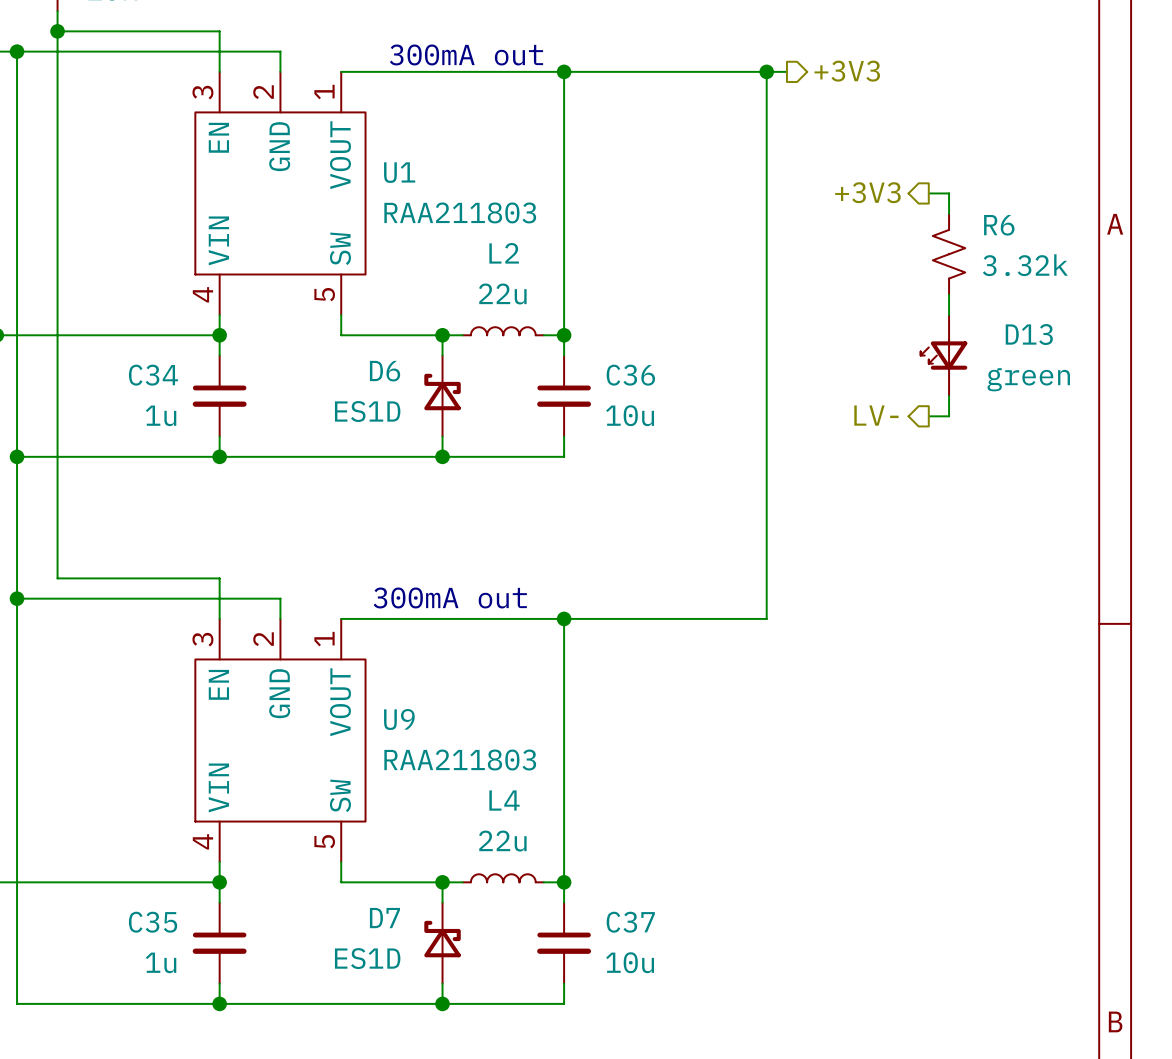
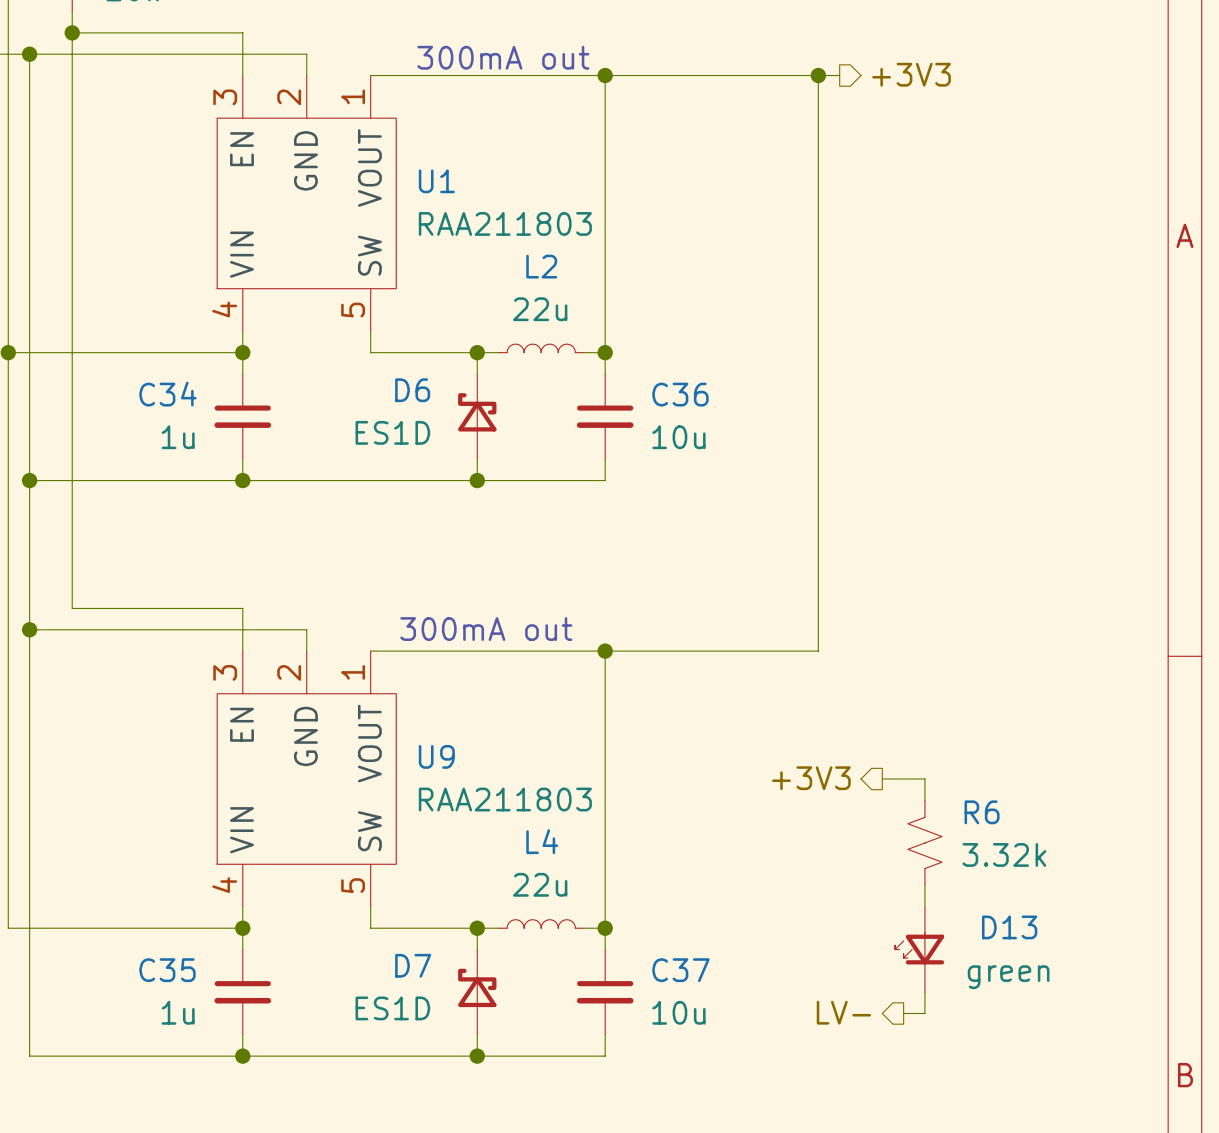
hierarchical label: +3V3 (867, 192) -> none
wire: (928, 193) (949, 193) (949, 213) -> none
R6 position: (949, 254) -> (924, 842)
wire: (949, 294) (949, 315) -> none
D13 position: (944, 355) -> (919, 949)
wire: (949, 396) (949, 416) (928, 416) -> none
hierarchical label: LV- (876, 415) -> none
hierarchical label: none -> +3V3 (811, 778)
wire: none -> (882, 779) (924, 779) (924, 800)
wire: none -> (924, 885) (924, 906)
wire: none -> (924, 992) (924, 1013) (903, 1013)
hierarchical label: none -> LV- (843, 1012)

